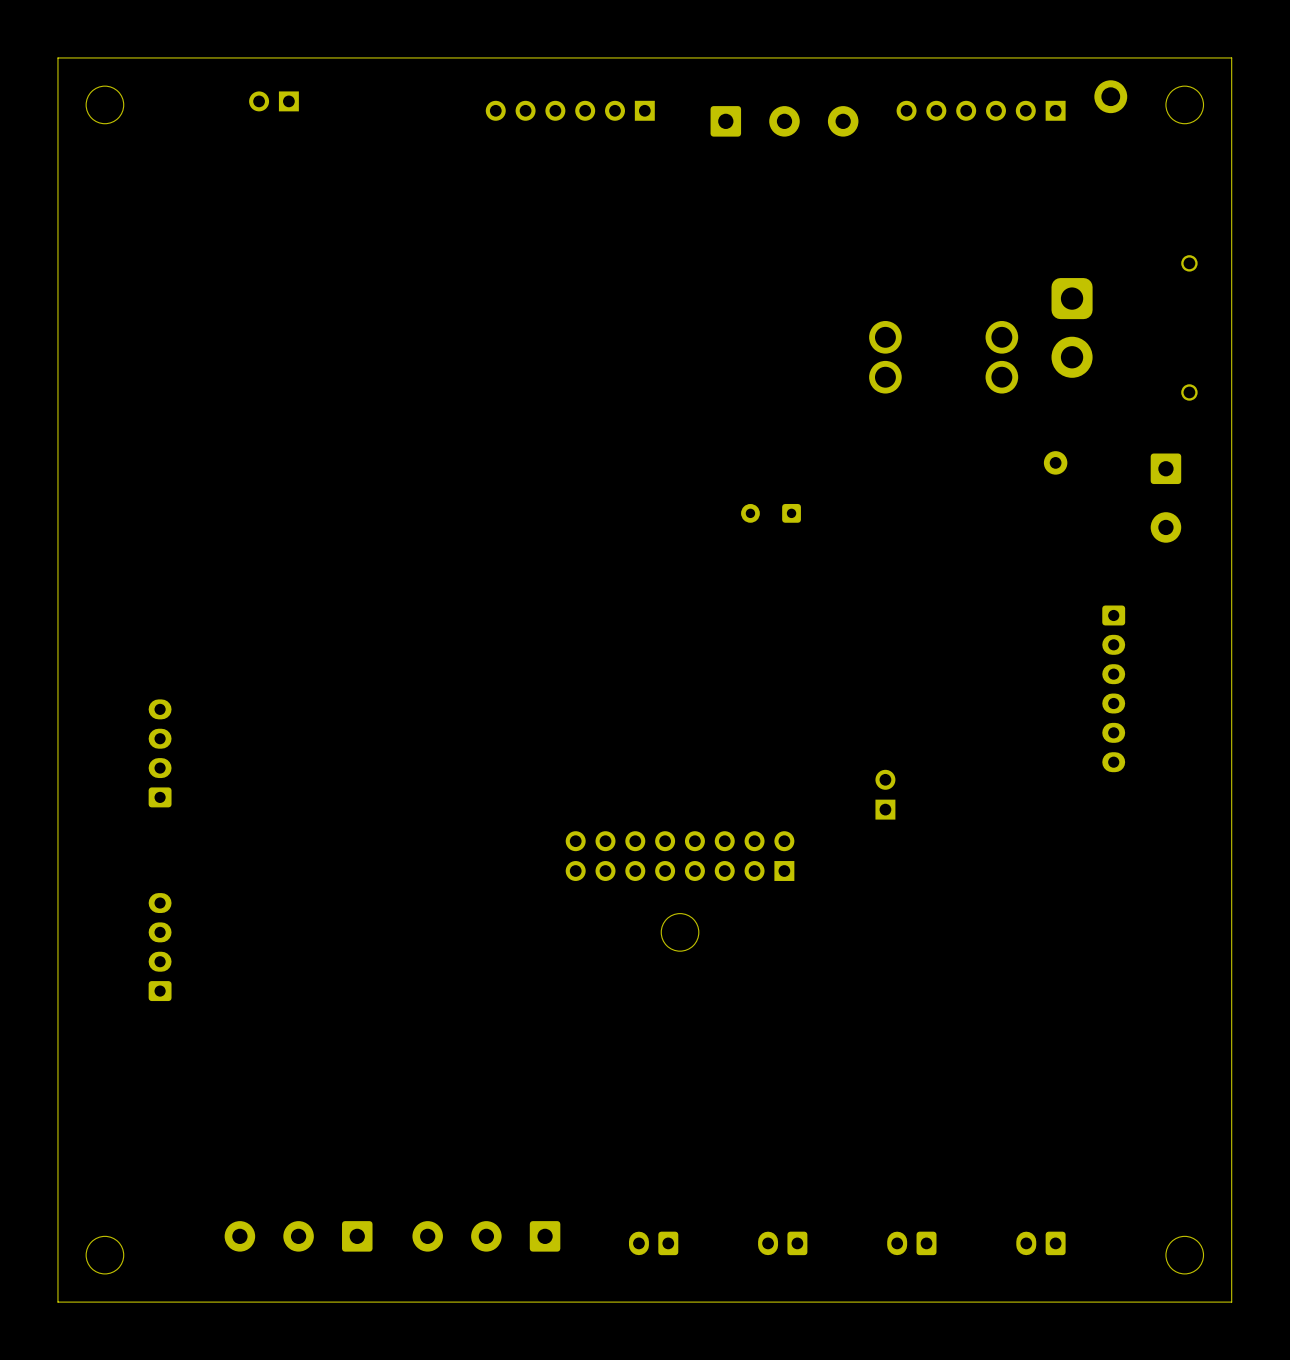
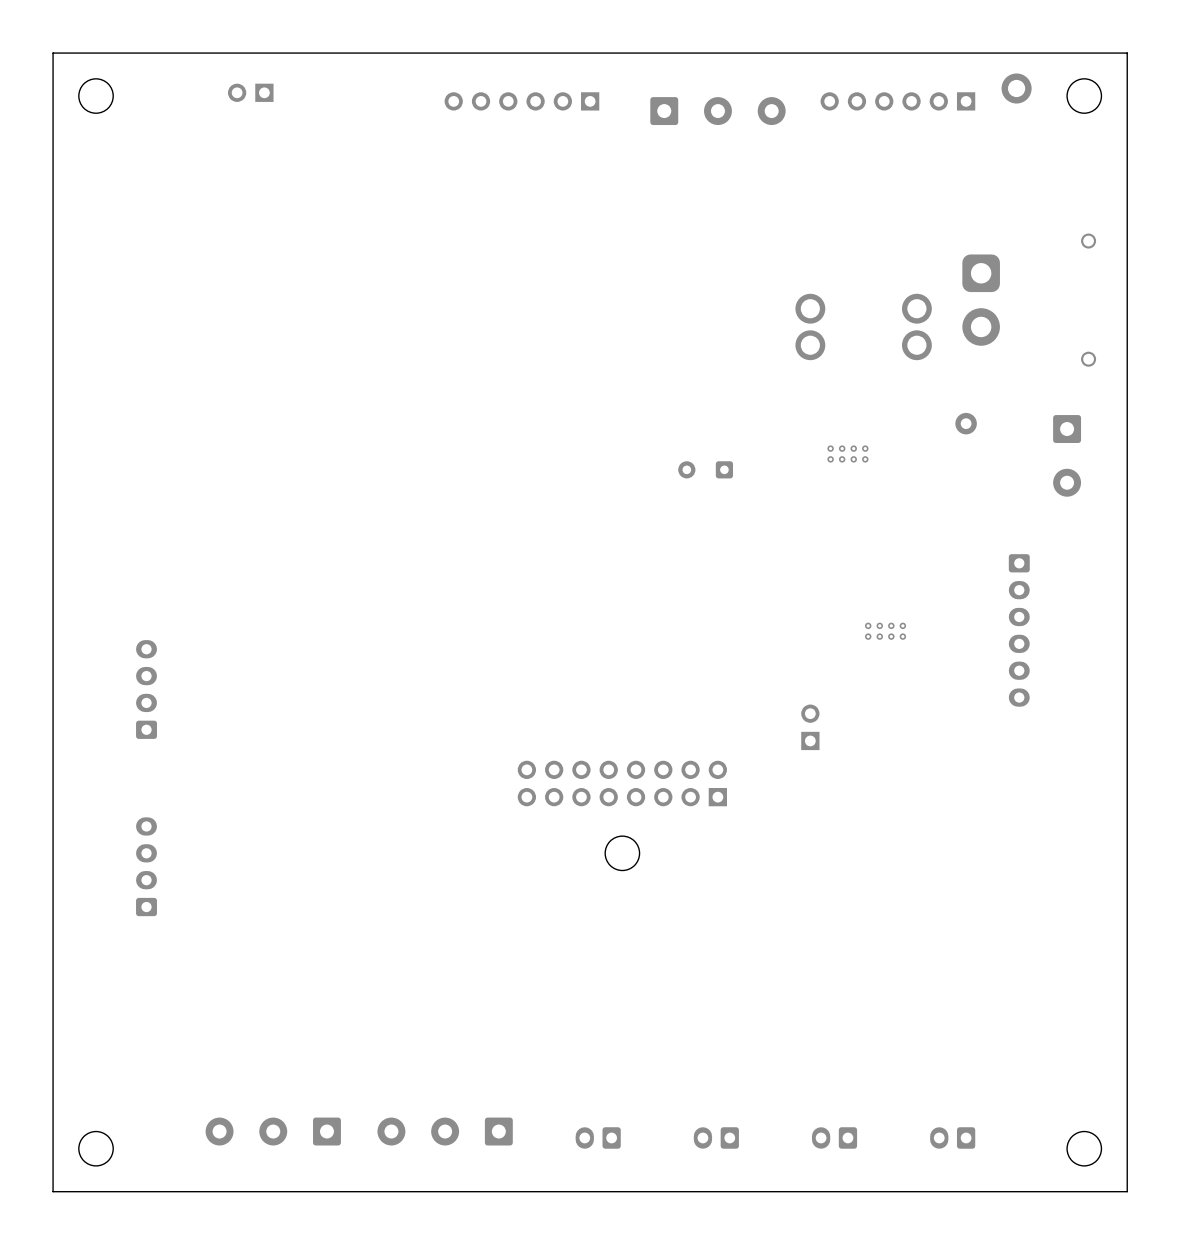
part: none -> (847, 453)
part: none -> (885, 631)

